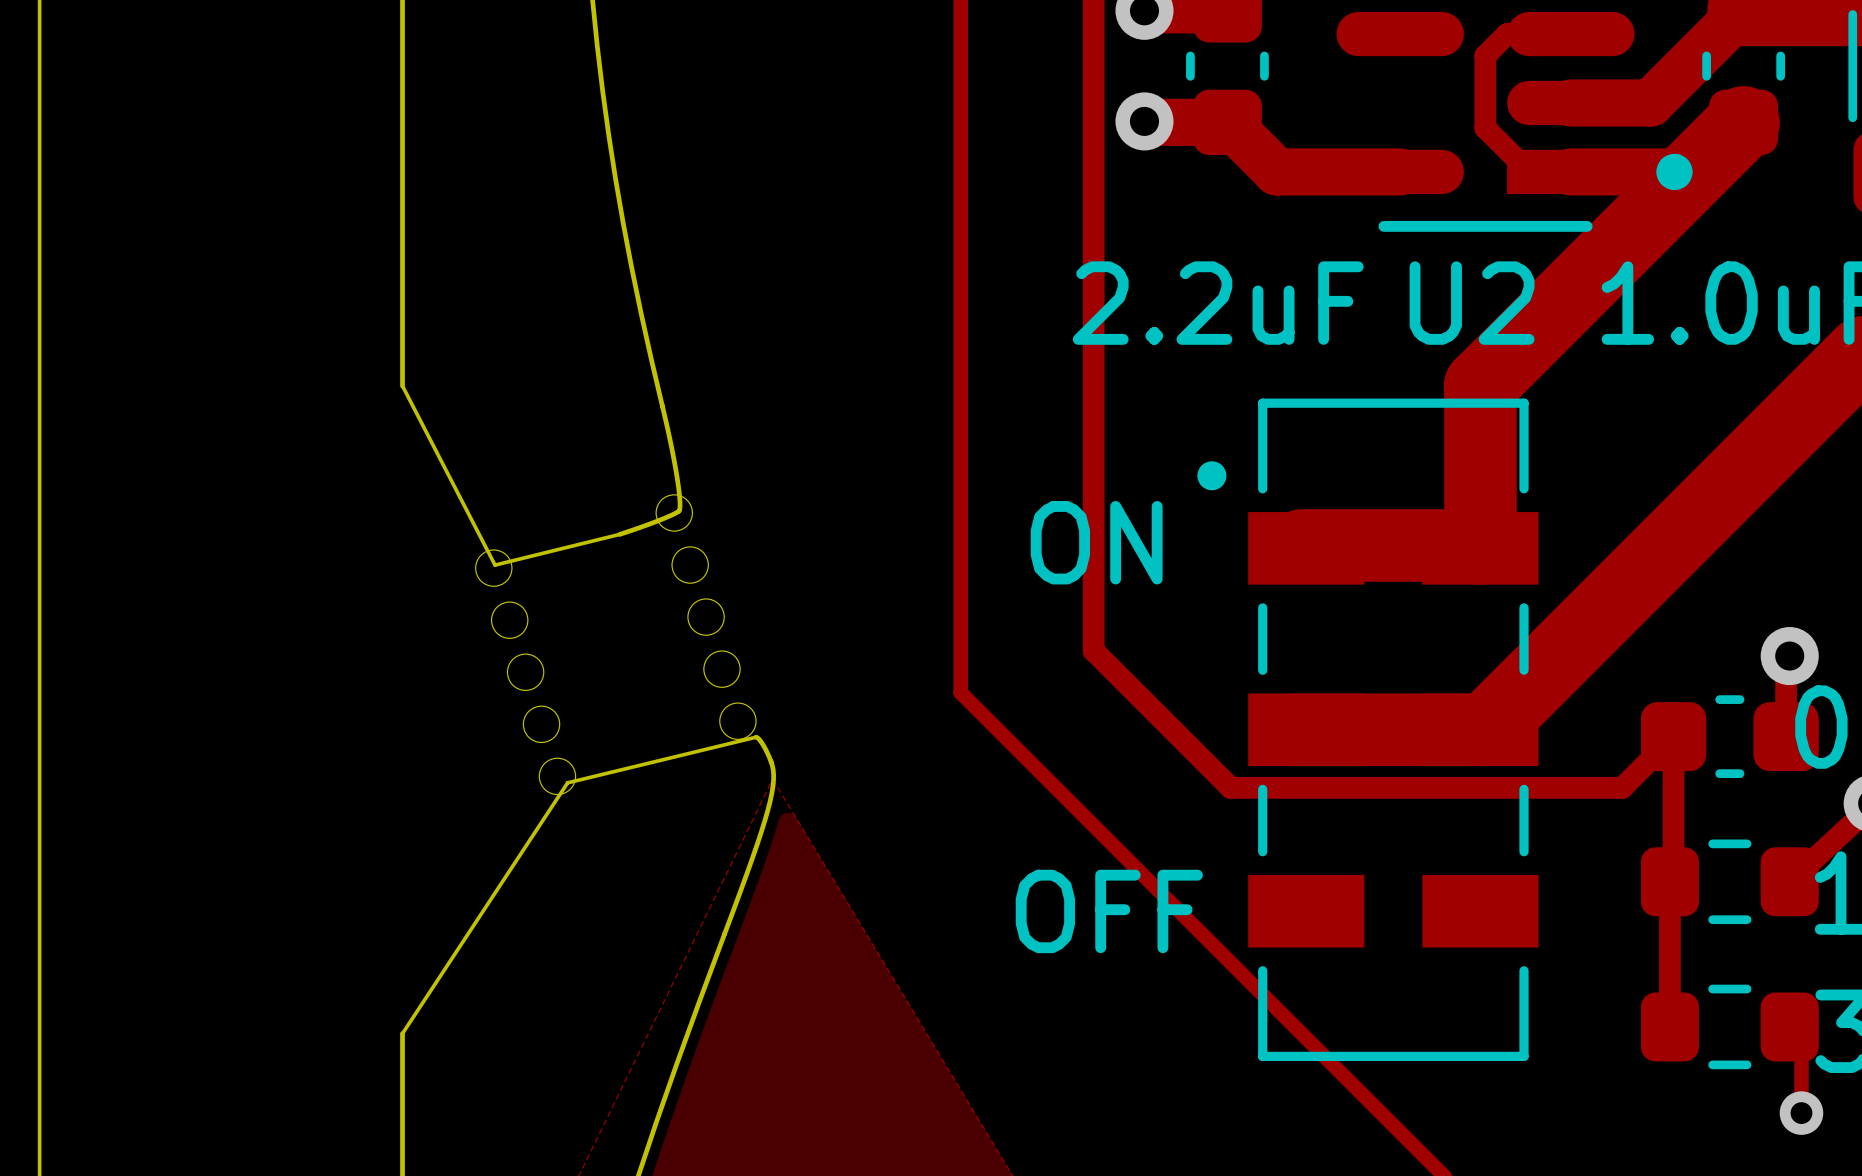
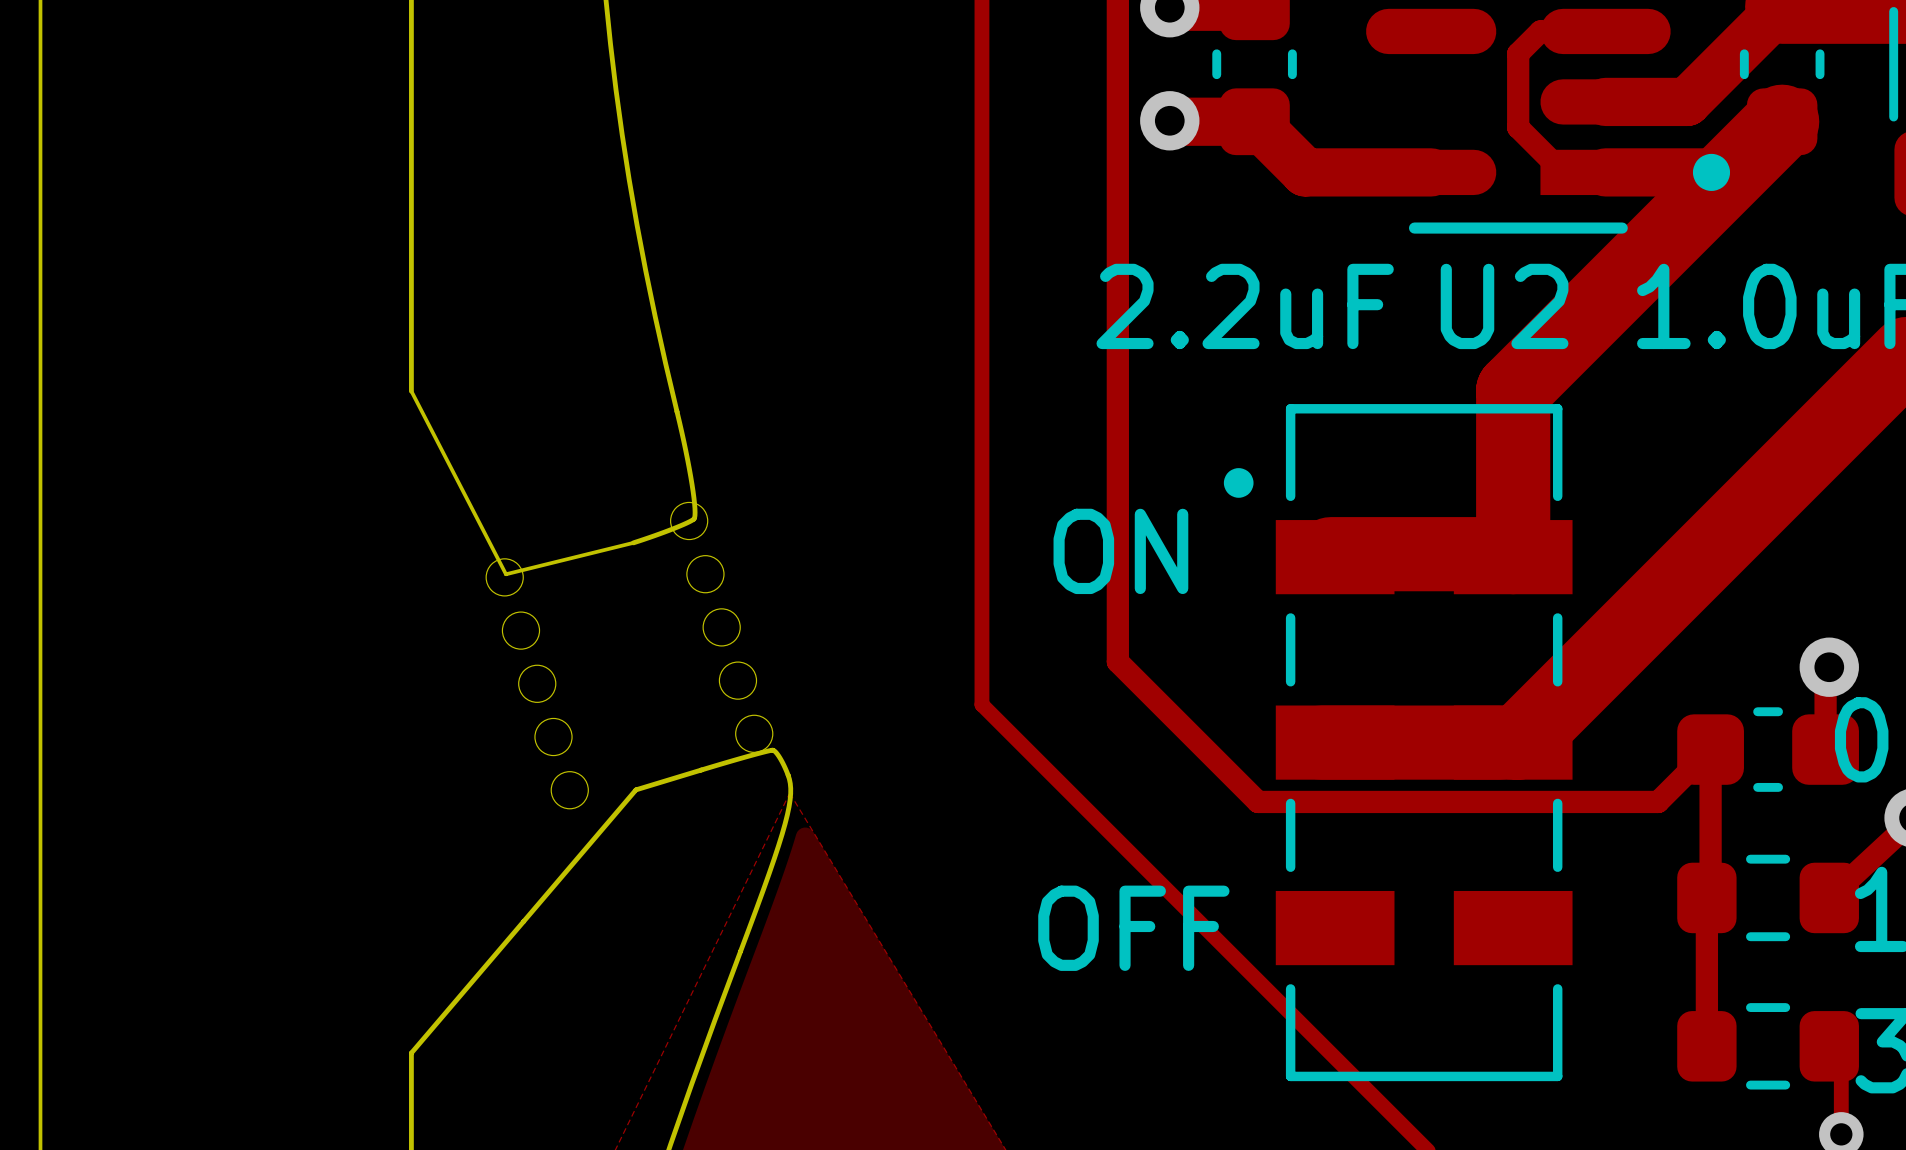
board edge: (755, 737) (567, 782) (402, 1033) -> (772, 750) (635, 789) (411, 1053)

